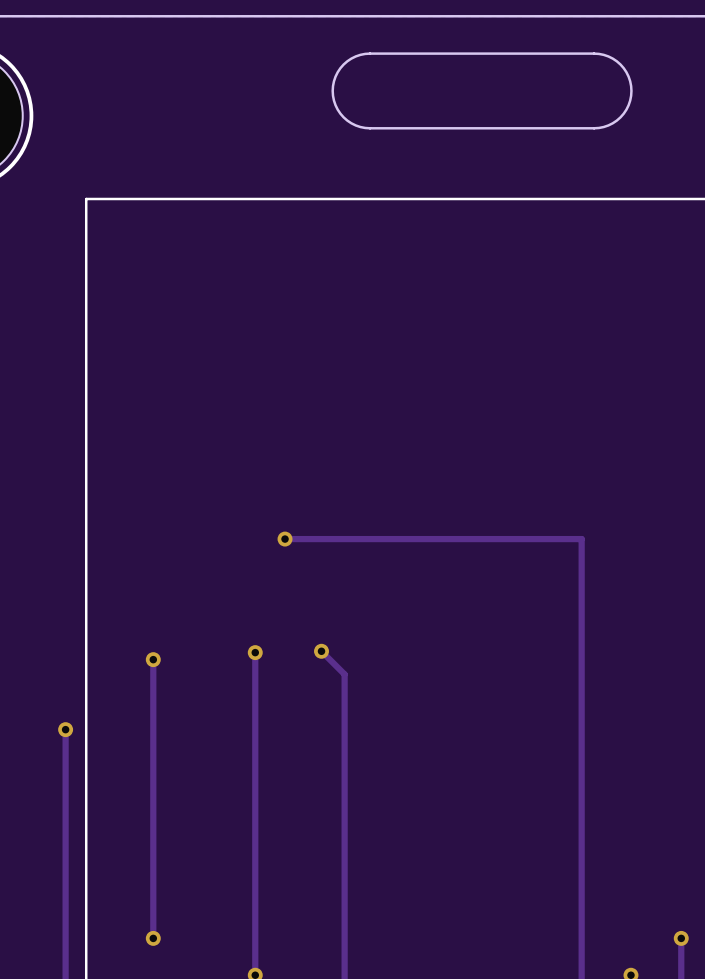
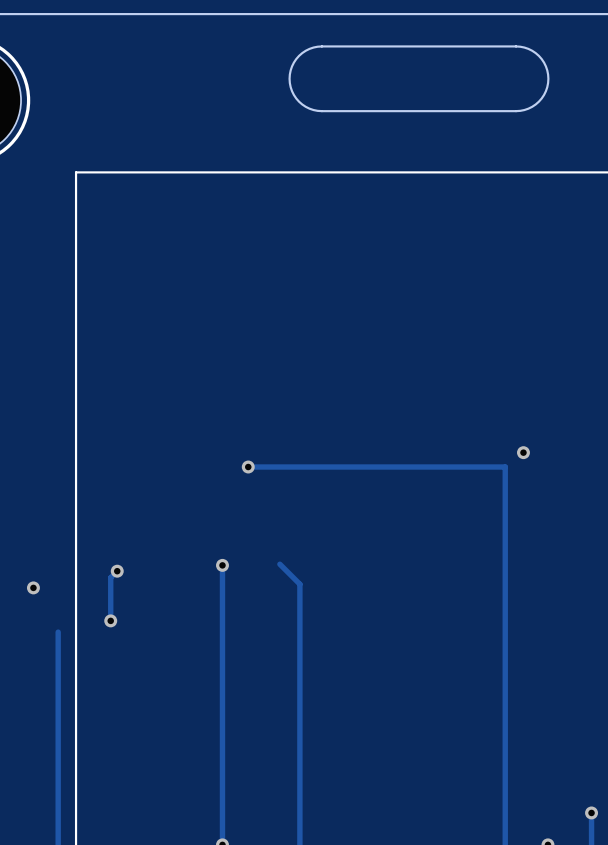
via: none -> (523, 452)
via: (321, 651) -> none
track: none -> (117, 571) (110, 577) (110, 620)
track: (153, 659) (153, 938) -> none
via position: (153, 659) -> (117, 571)
via: none -> (33, 587)
via: none -> (110, 620)
via: (65, 729) -> none
via: (153, 938) -> none

